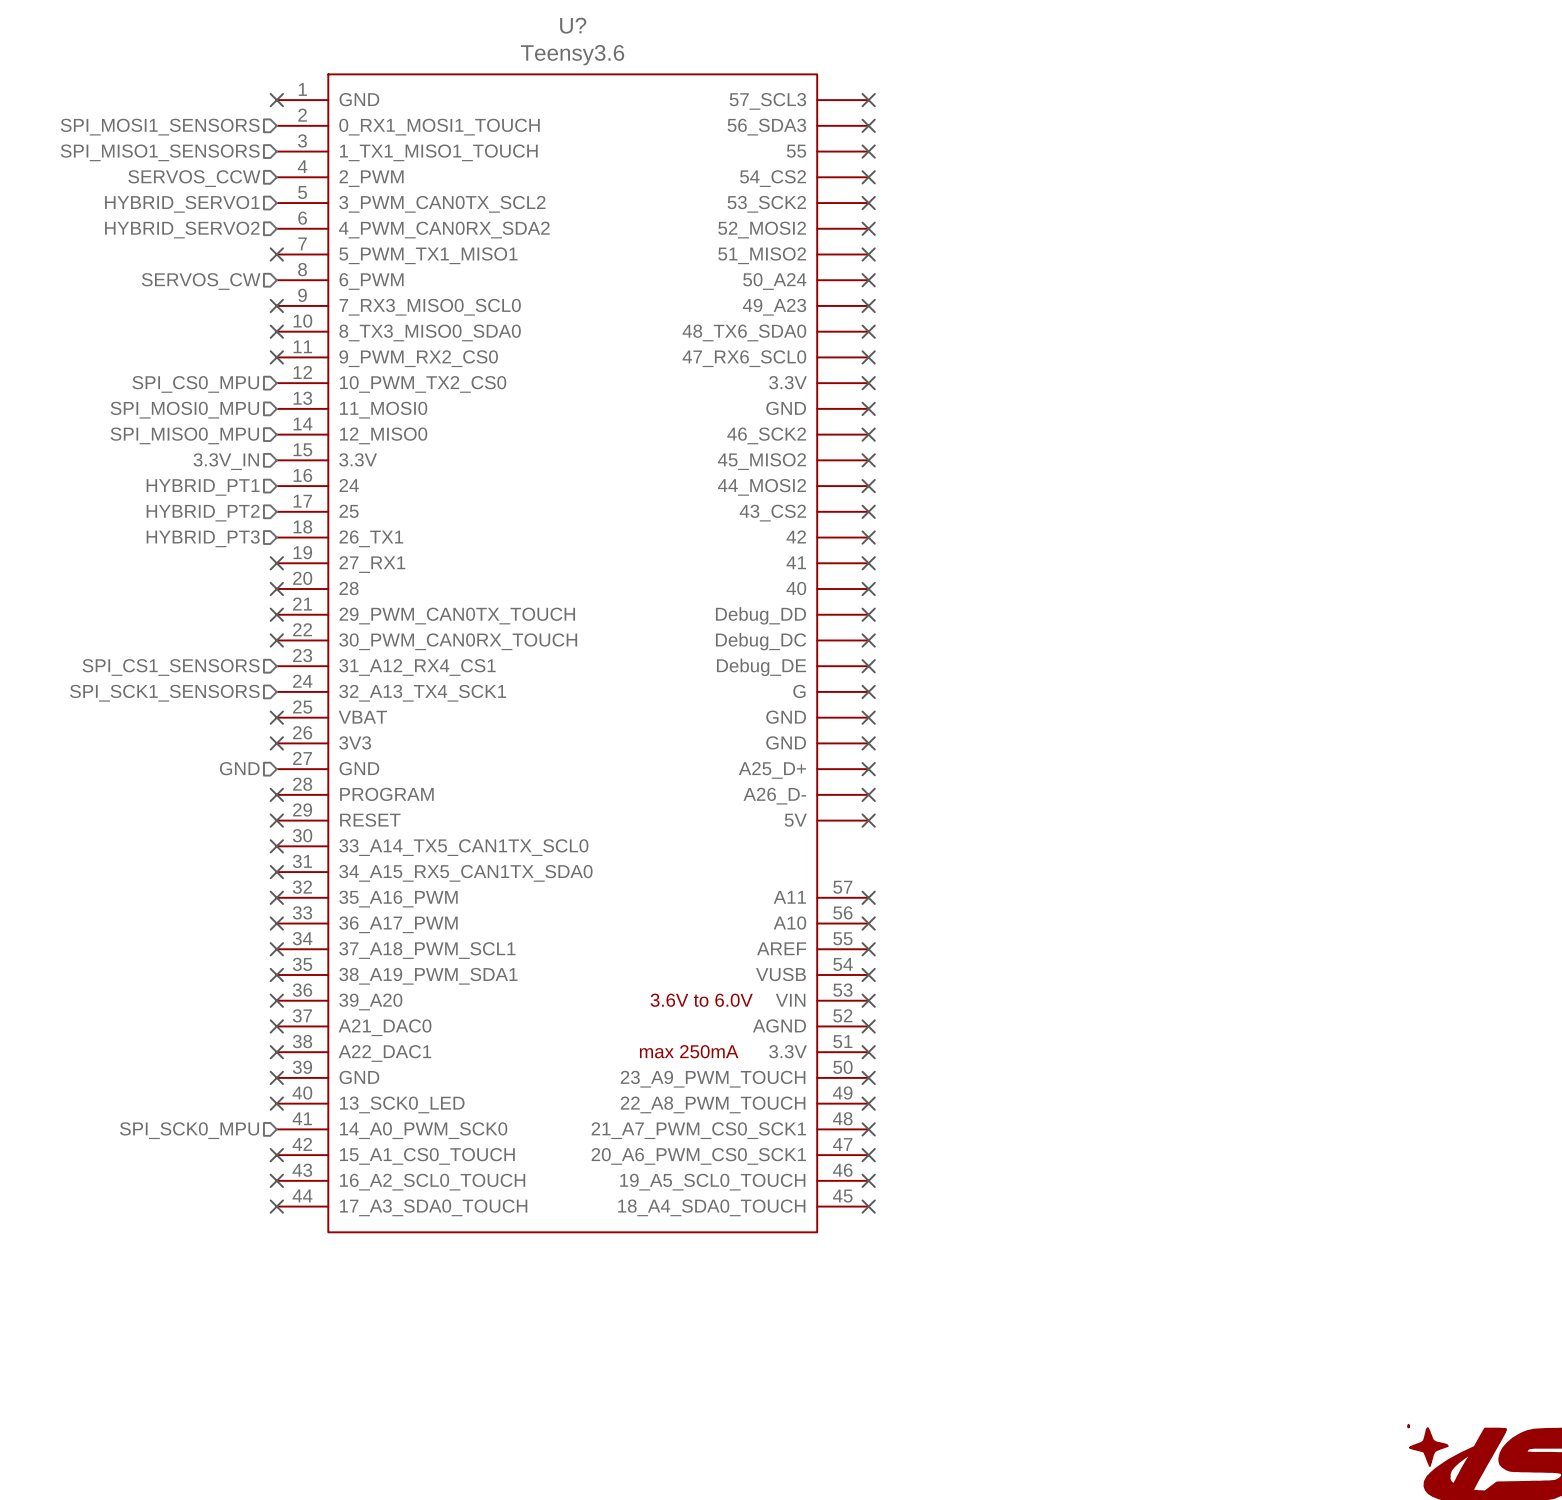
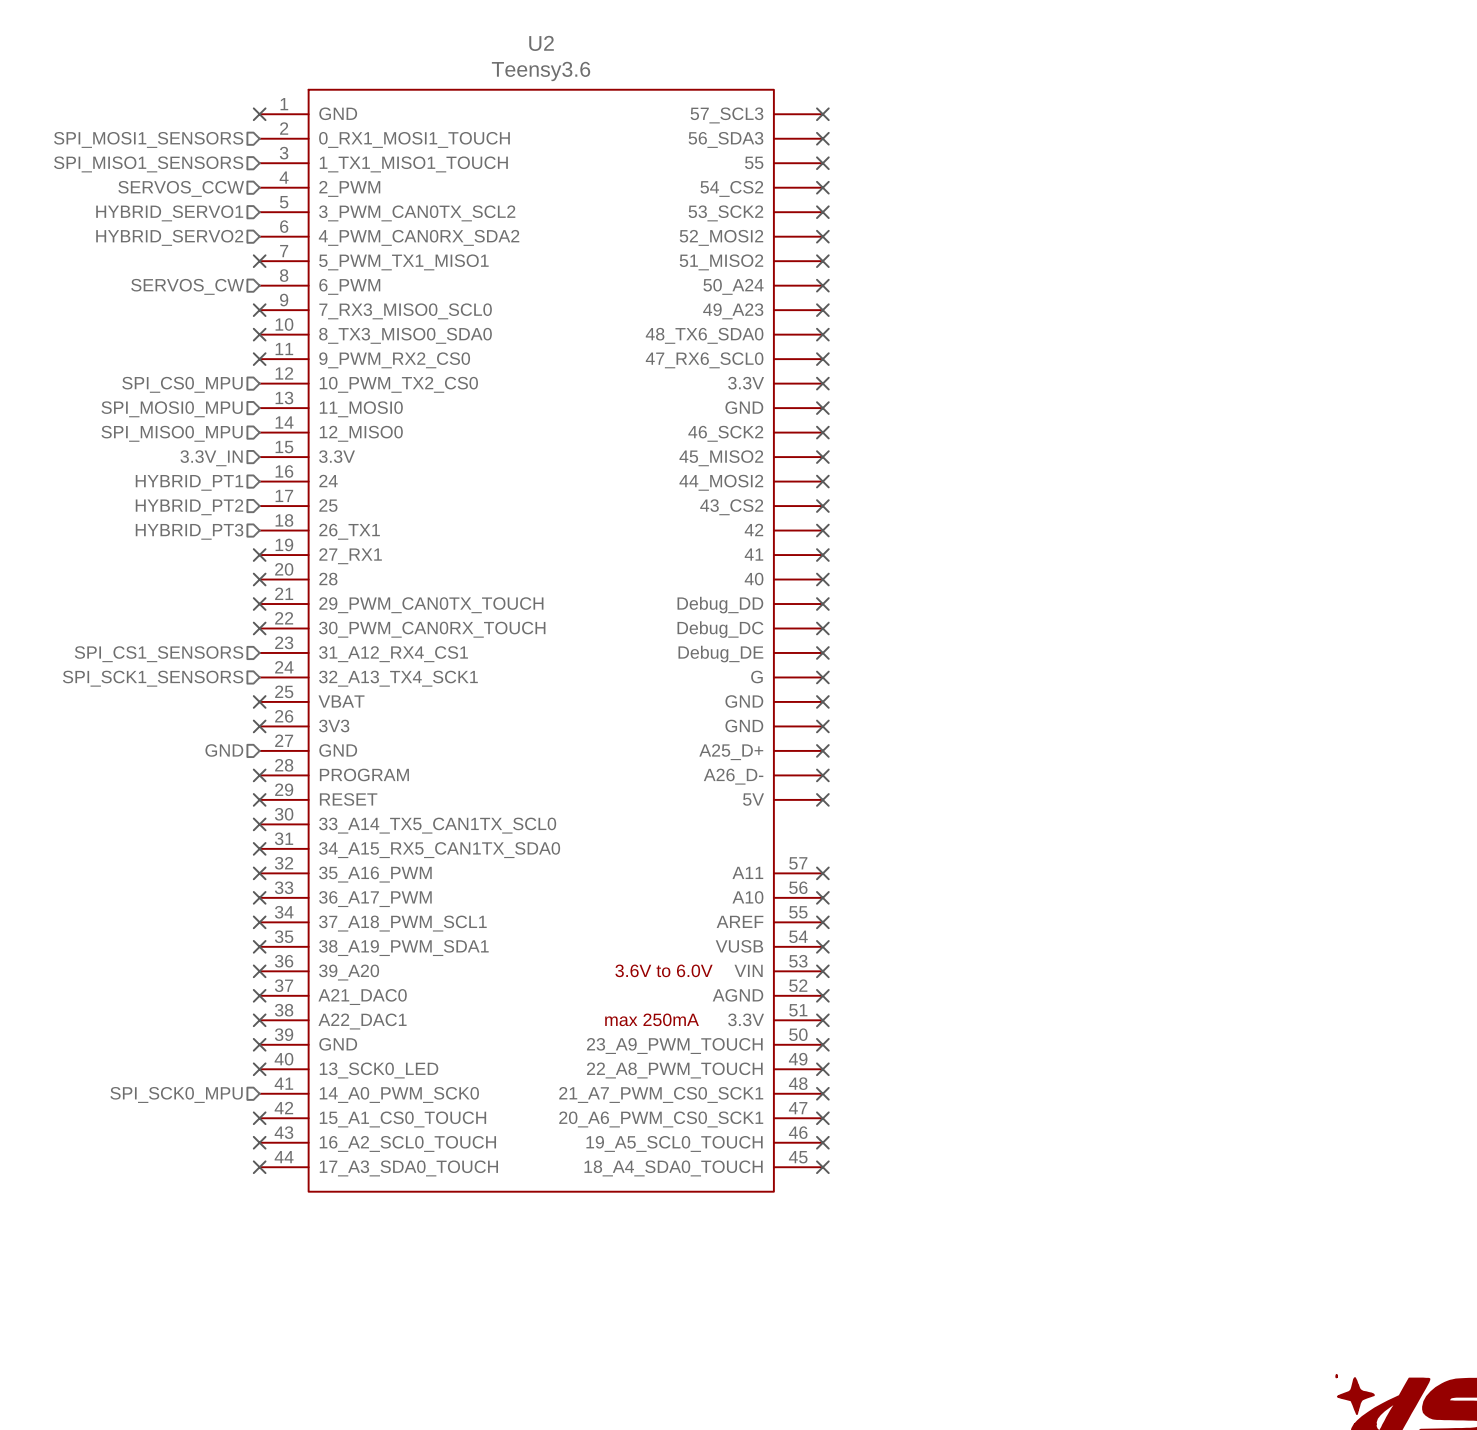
U? name: U? (573, 25) -> U2 (541, 43)

